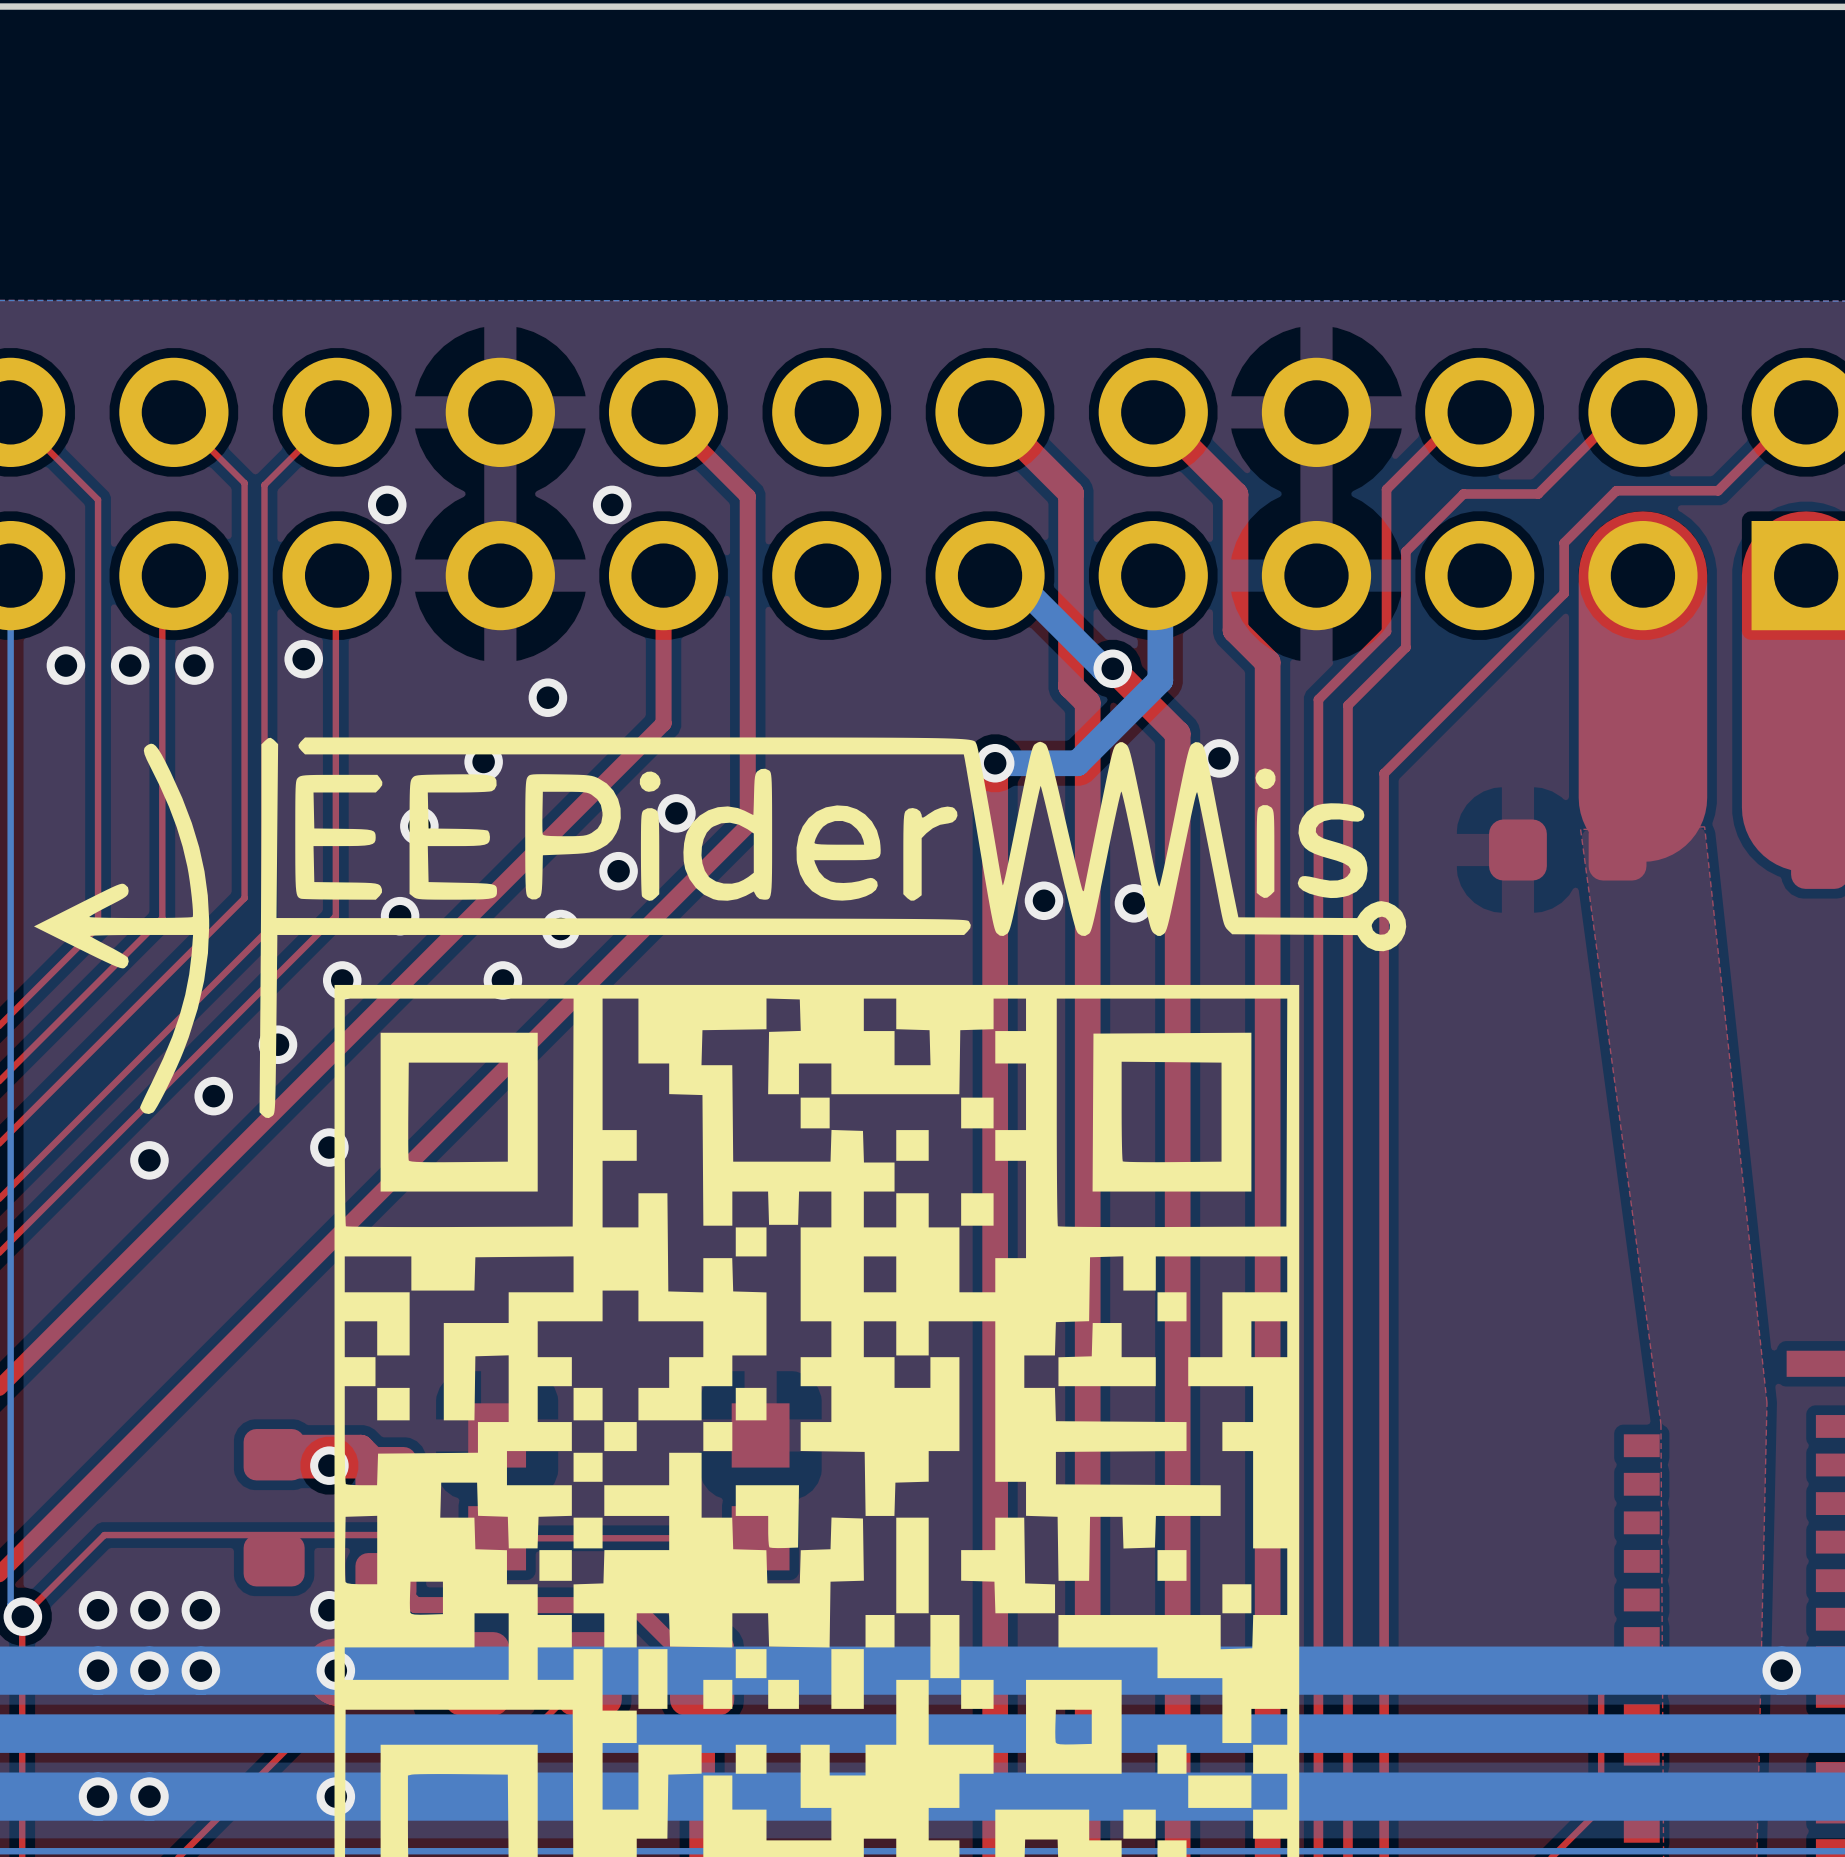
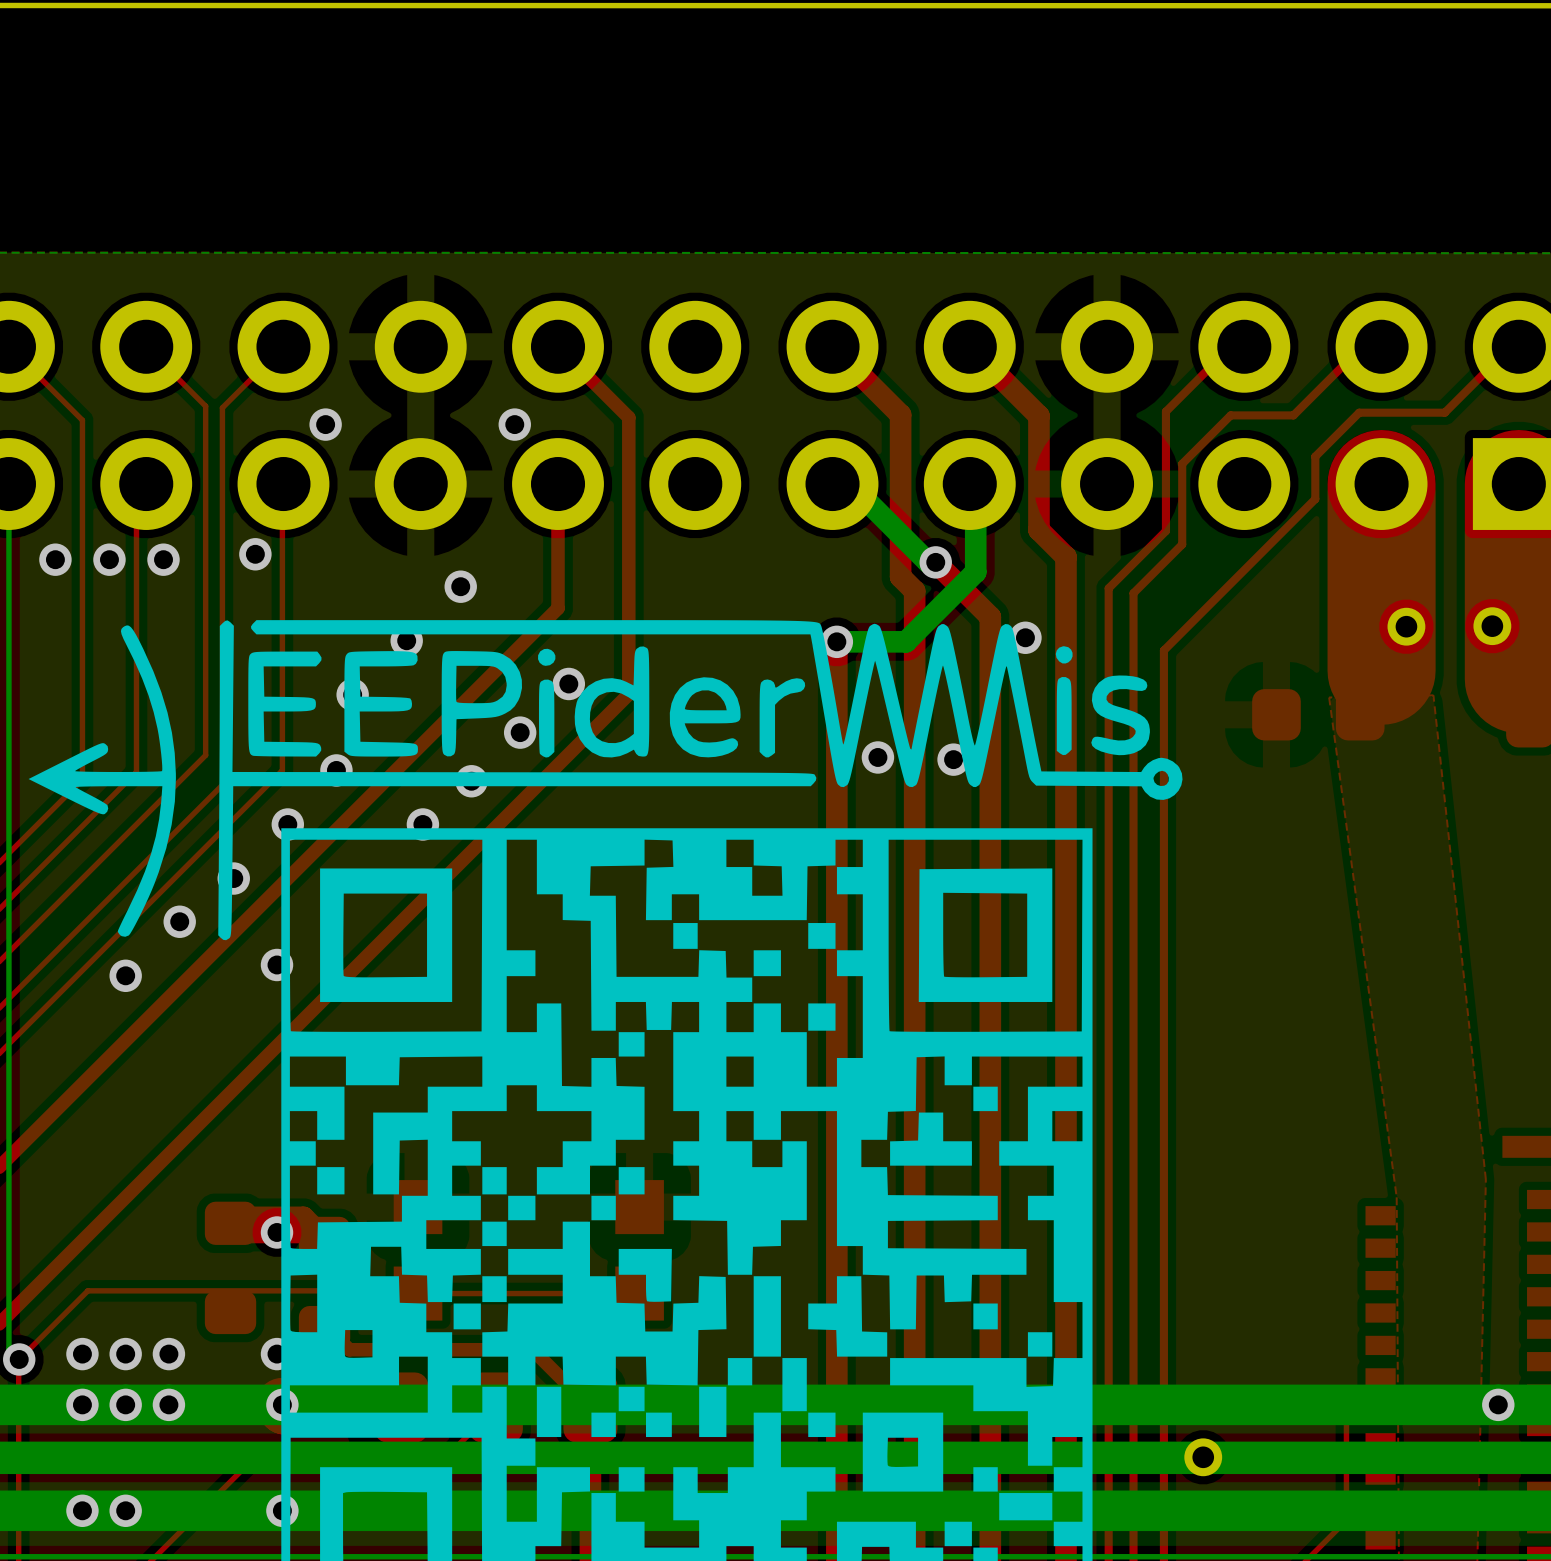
part: none -> (1492, 626)
part: none -> (1406, 626)
part: none -> (1203, 1457)

